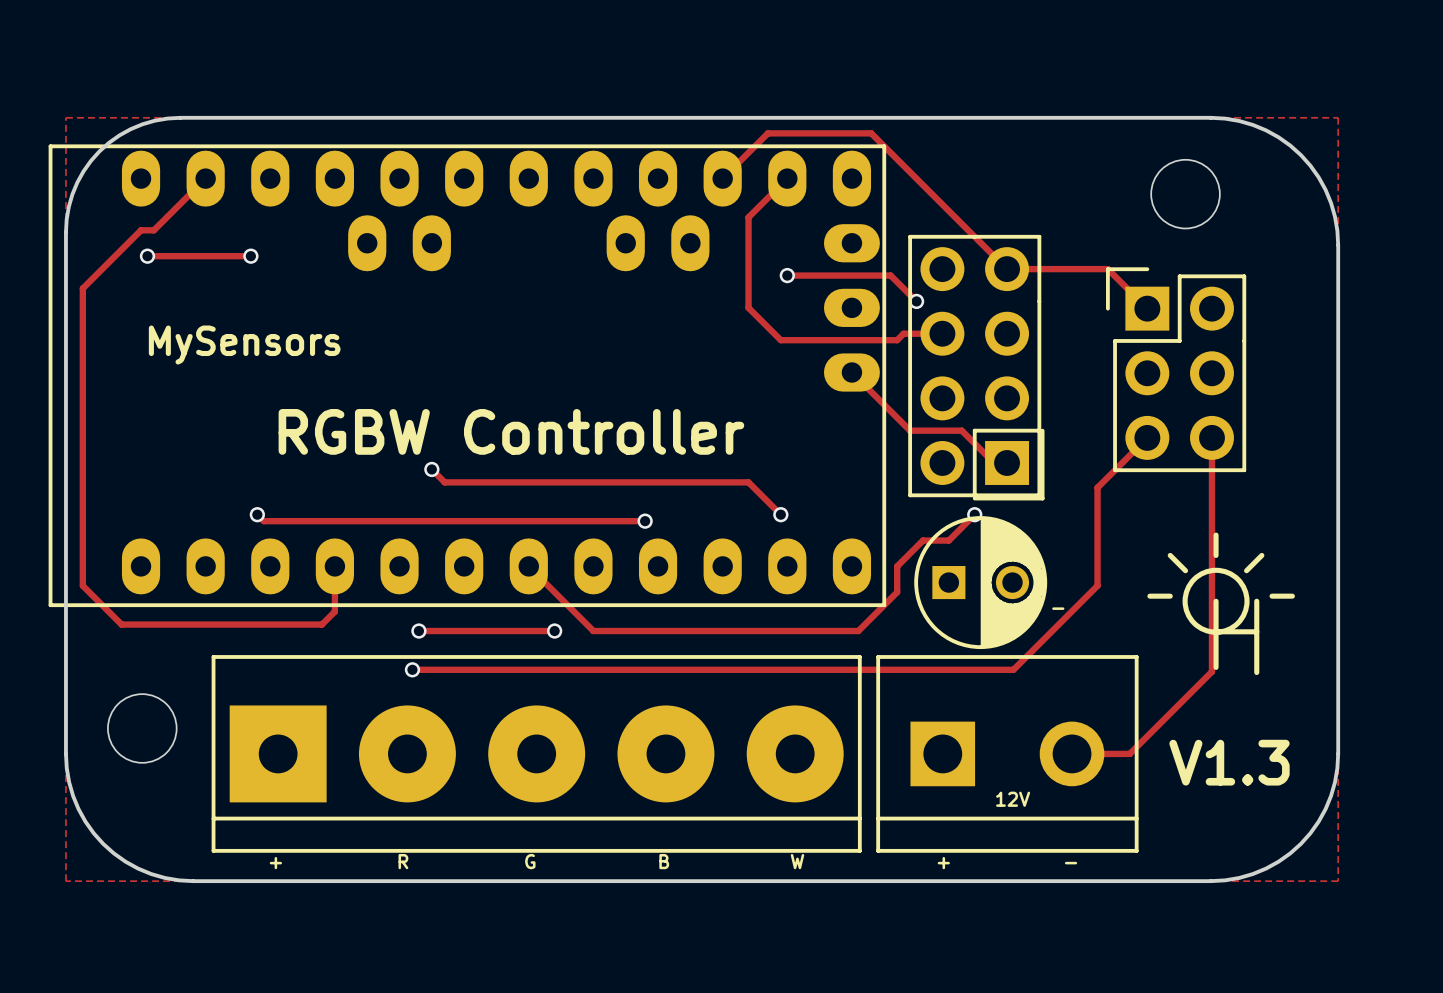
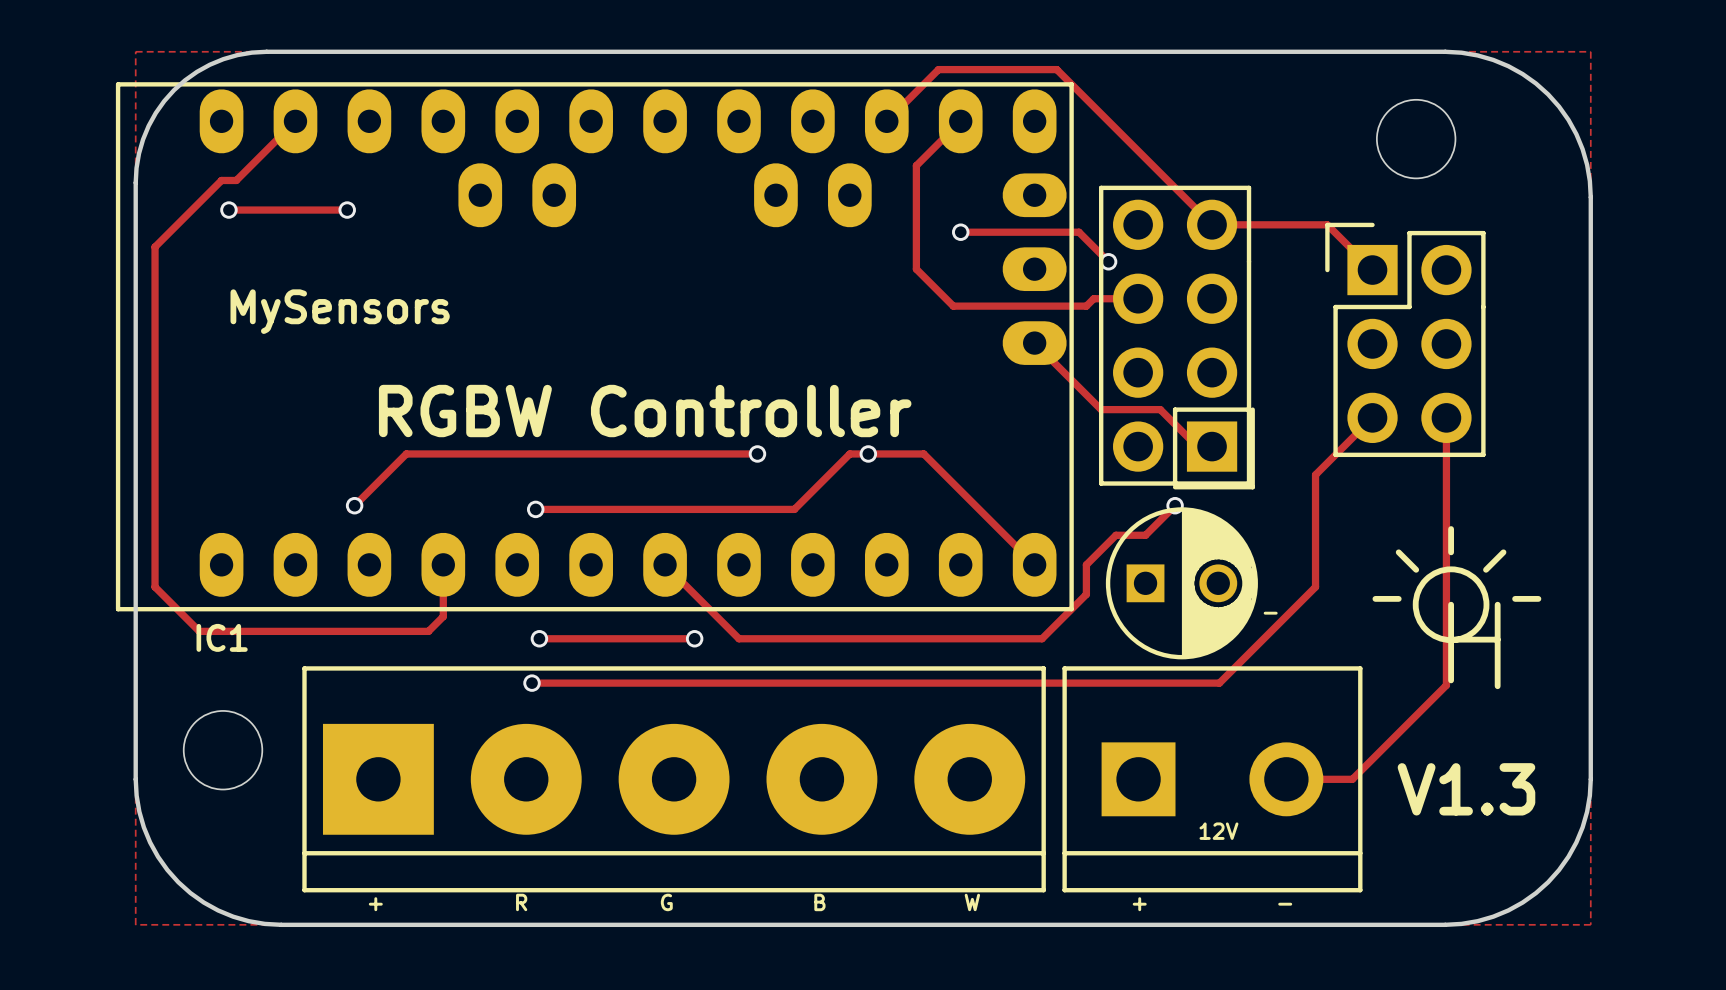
track: (431, 469) (444, 482) (748, 482) (780, 514) -> none
via position: (431, 469) -> (535, 509)
track: none -> (757, 453) (406, 453) (350, 509)
via: none -> (757, 453)
via: none -> (868, 453)
track: (257, 514) (263, 521) (645, 521) -> none
via: (780, 514) -> none
track: none -> (535, 509) (794, 509) (849, 453) (923, 453) (1034, 564)
via: (645, 521) -> none
IC1 name: none -> IC1 (222, 637)

